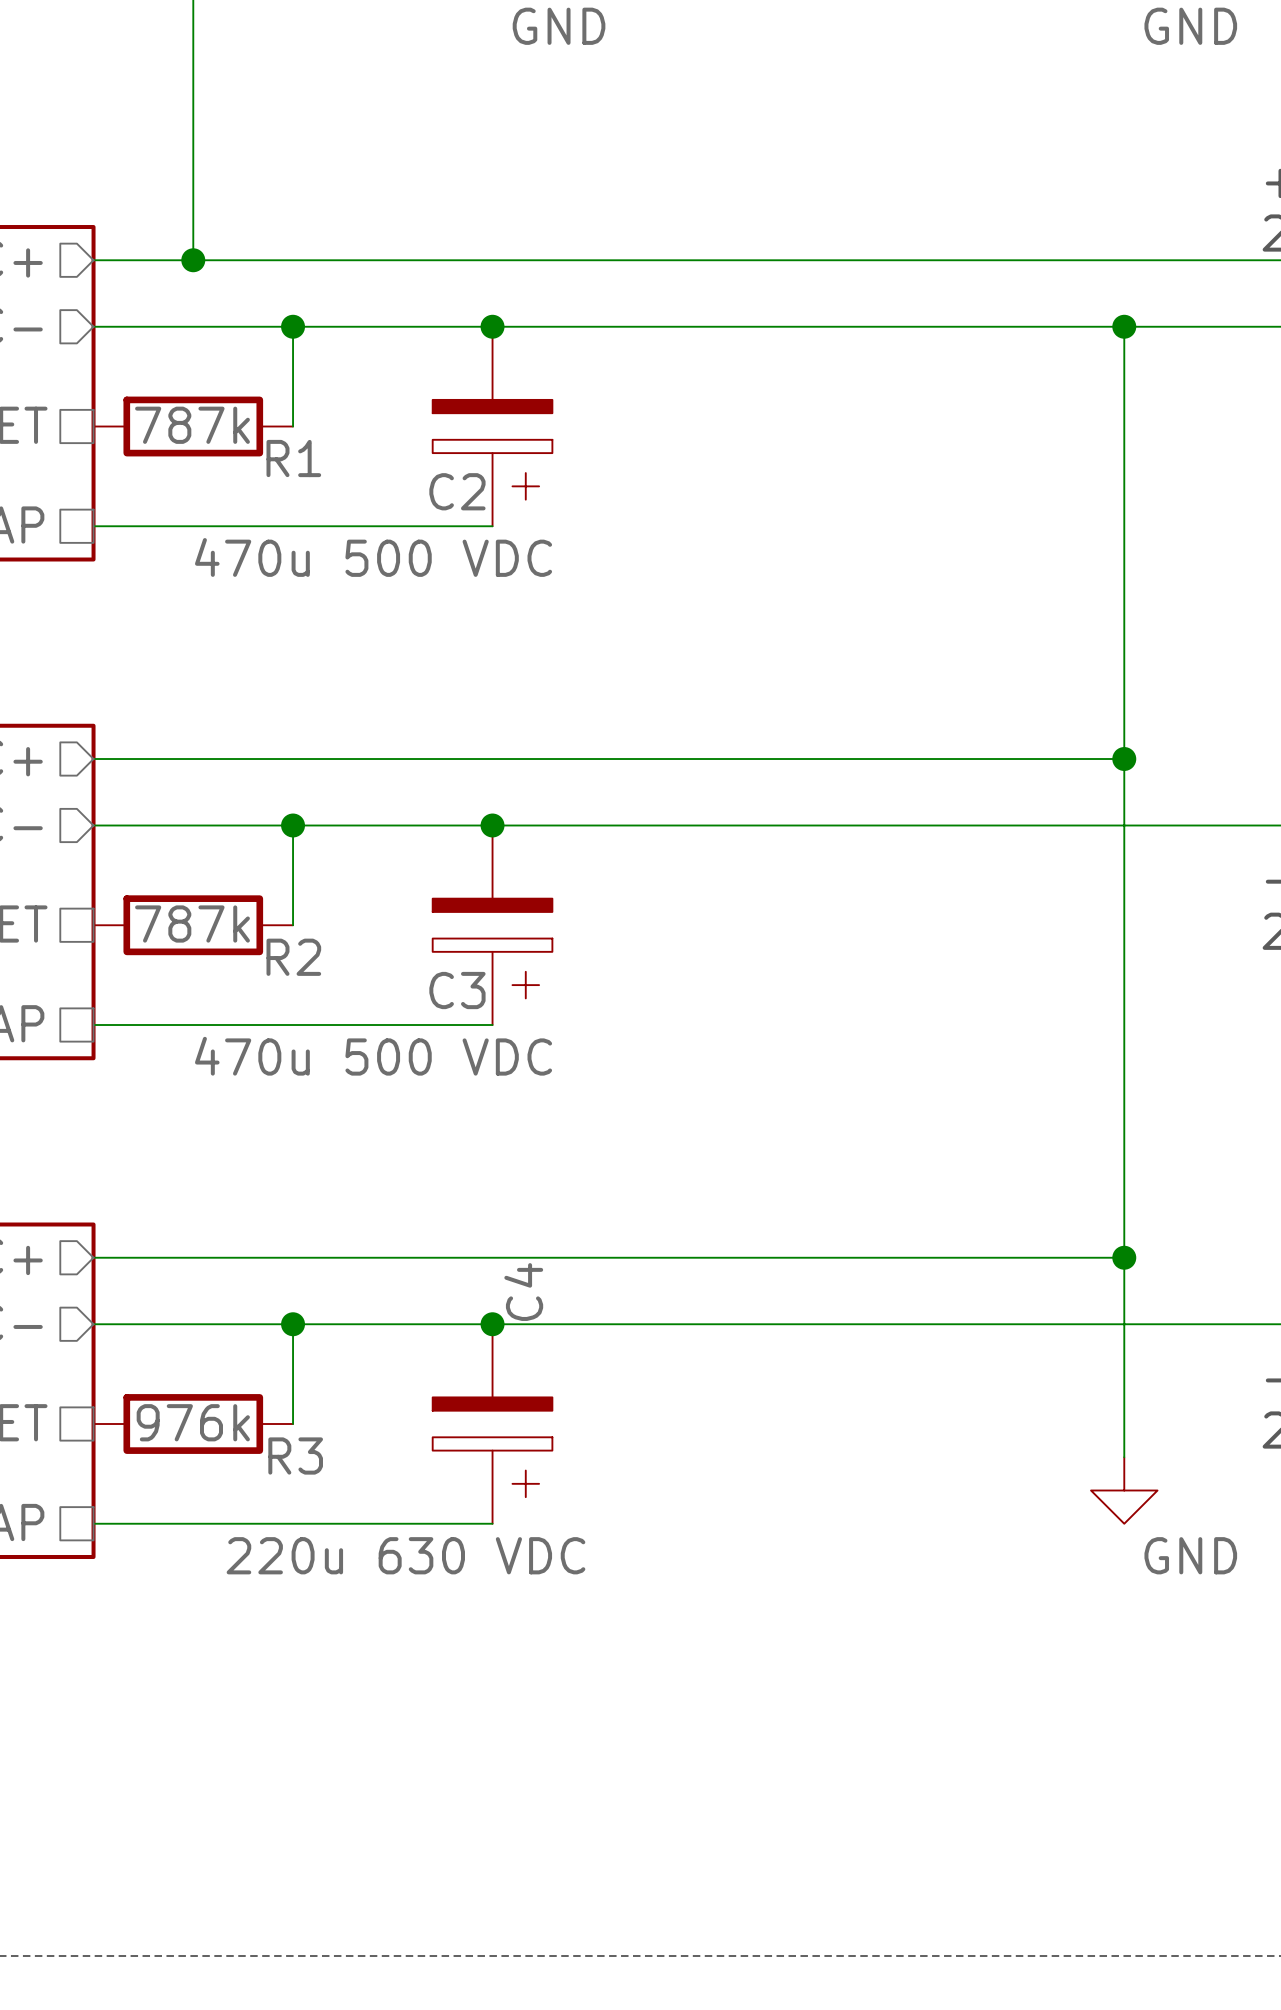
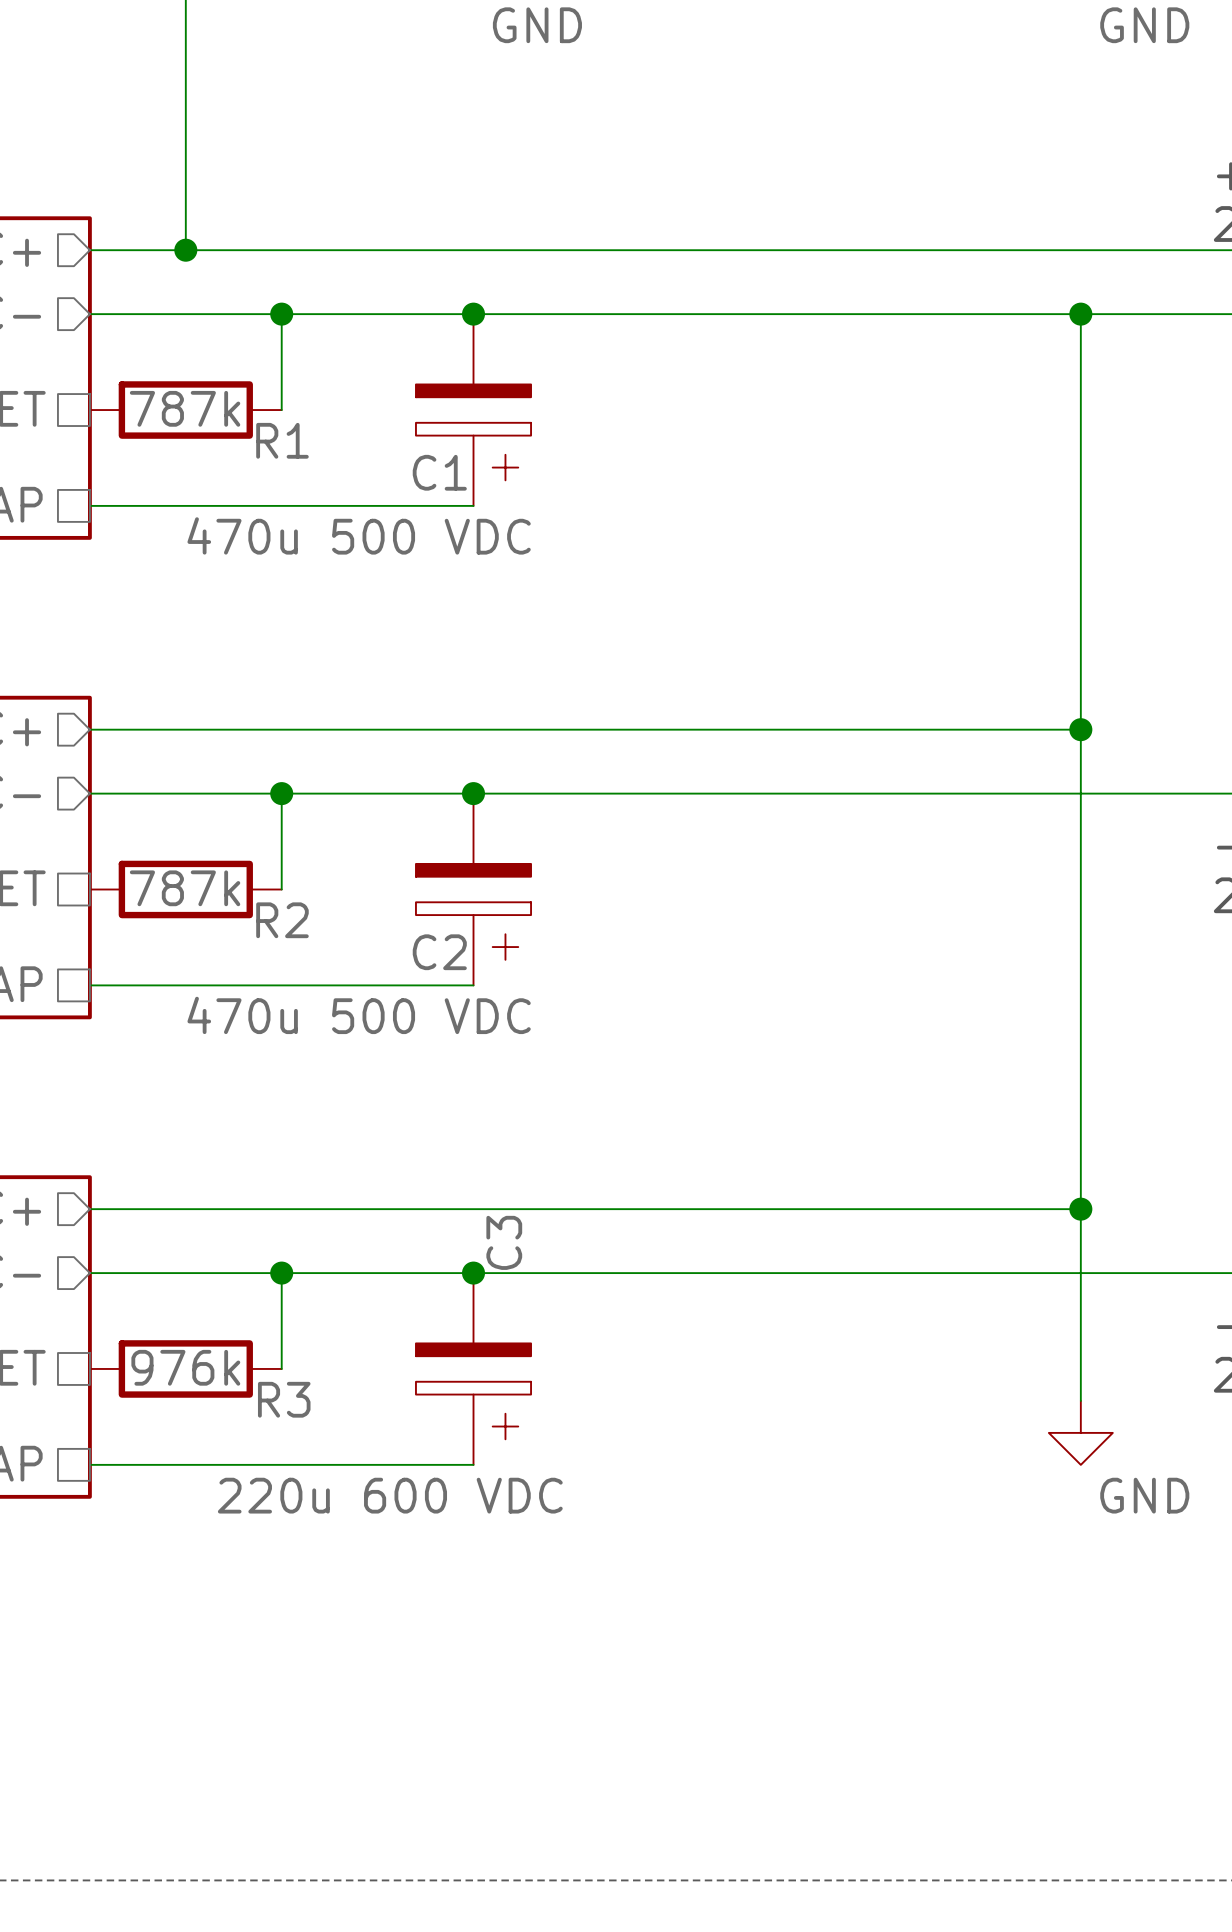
C2 name: C2 (457, 491) -> C1 (439, 472)
C3 name: C3 (457, 990) -> C2 (439, 952)
C4 name: C4 (523, 1292) -> C3 (504, 1242)
C4 value: 220u 630 VDC (405, 1555) -> 220u 600 VDC (390, 1495)

